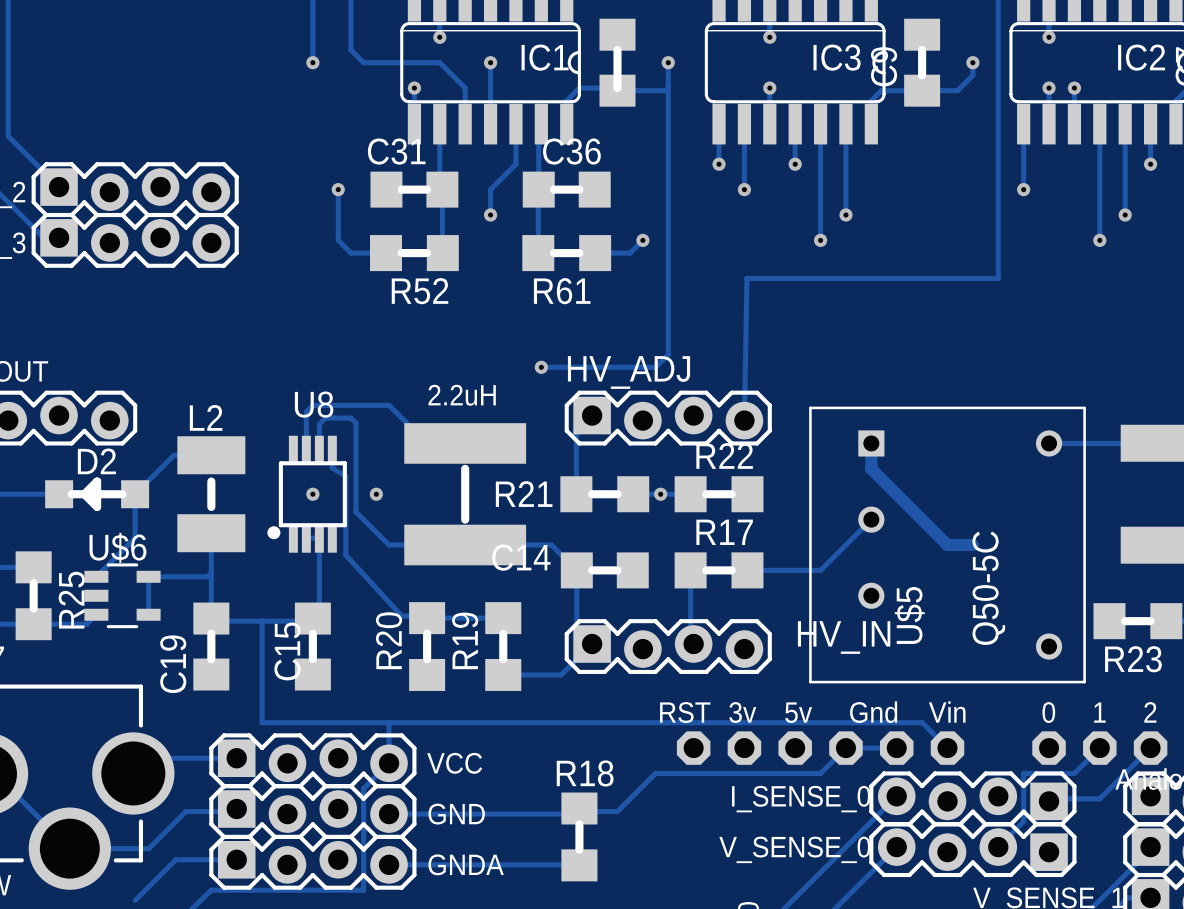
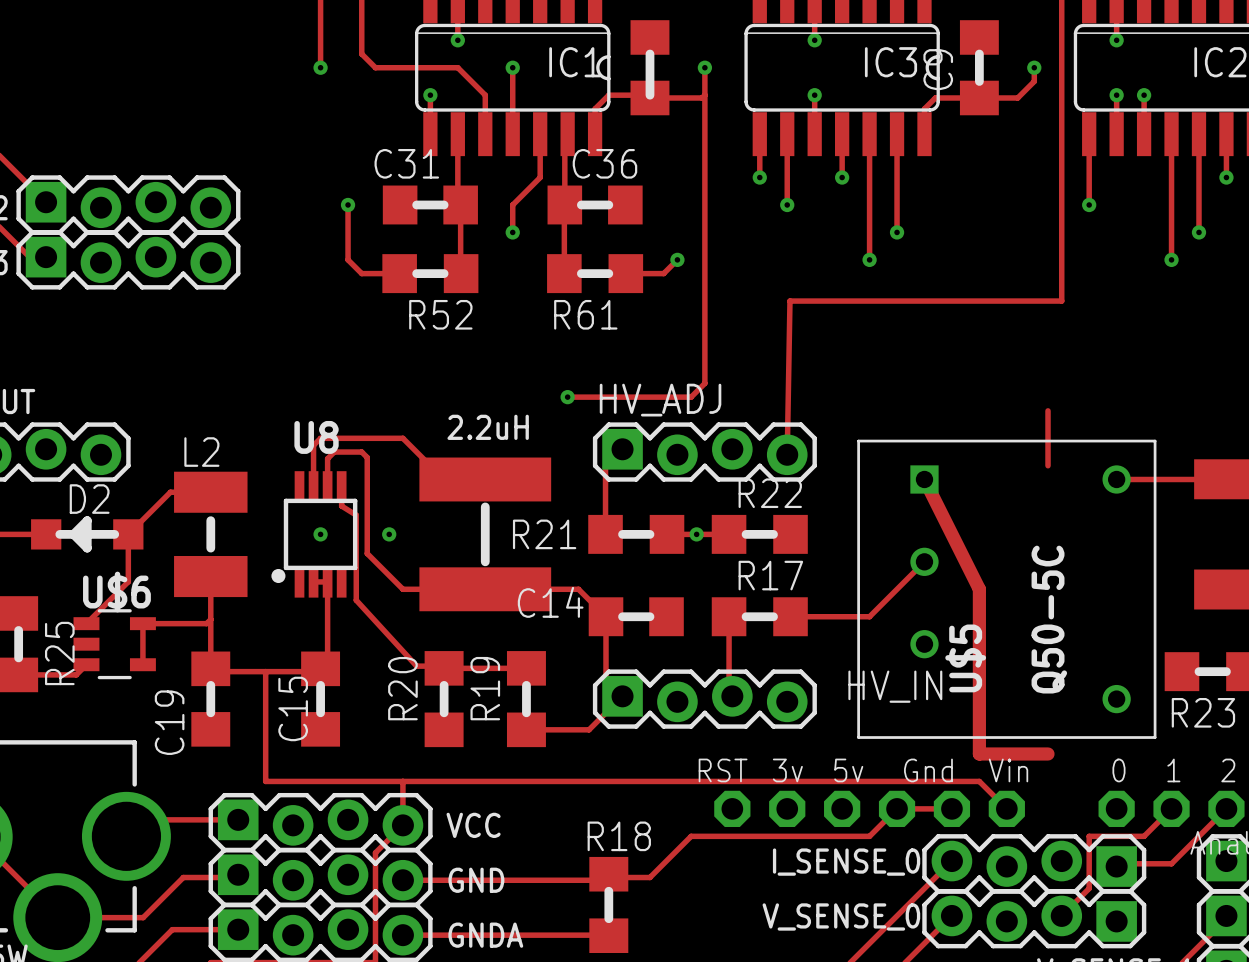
track: none -> (1048, 410) (1048, 465)
track: (871, 443) (871, 468) (947, 545) (972, 545) -> (924, 479) (979, 589) (979, 753) (1048, 753)

